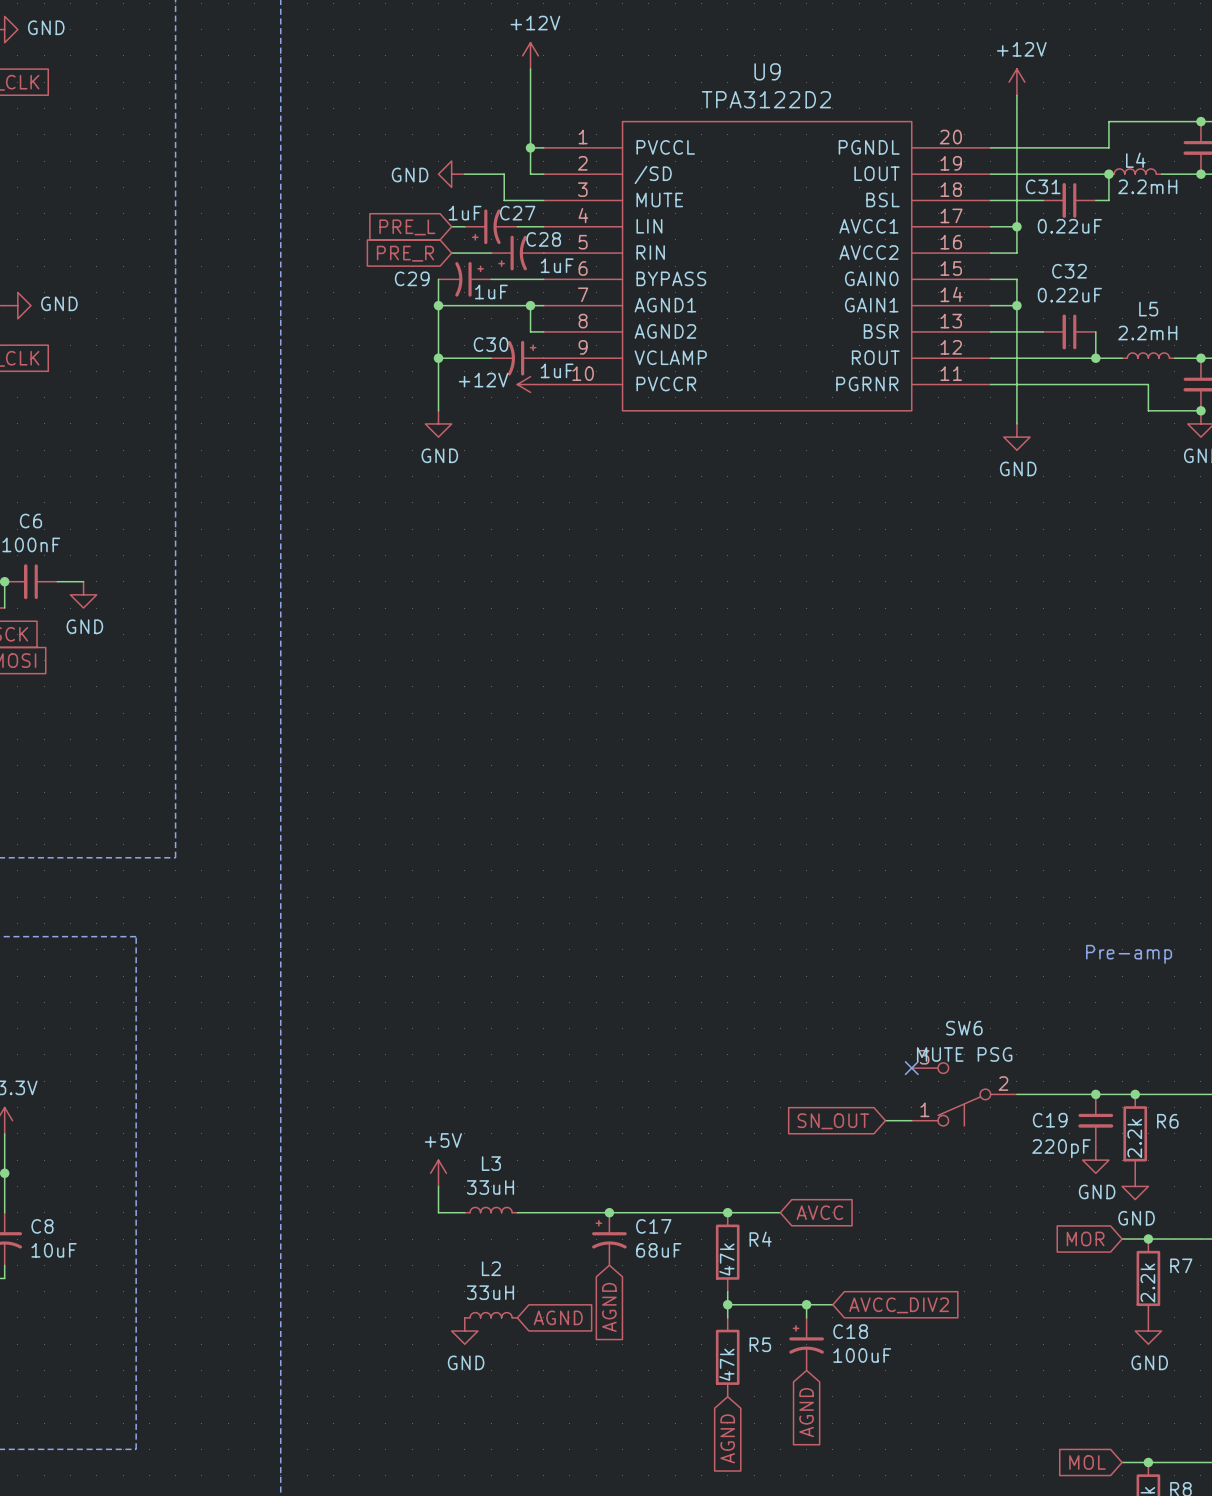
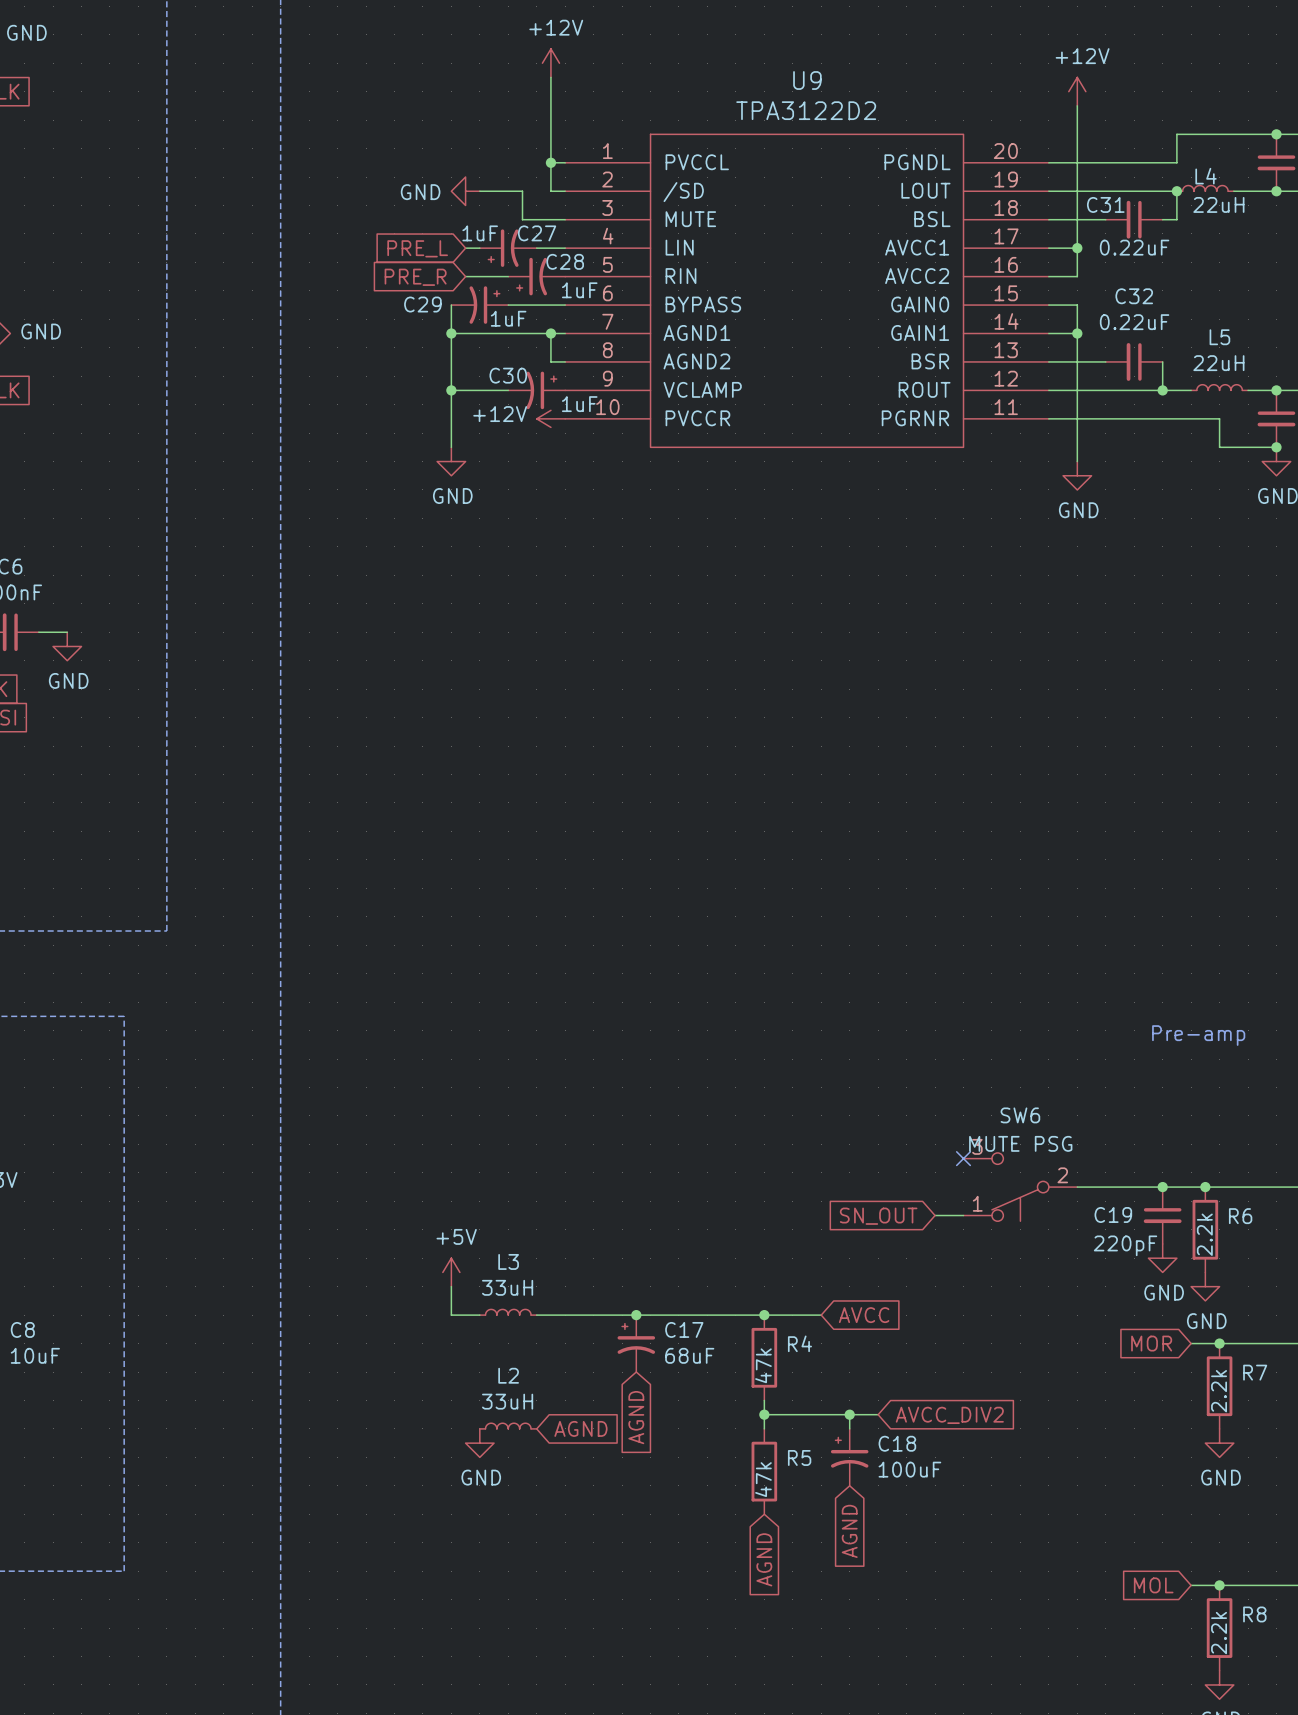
L4 value: 2.2mH (1147, 186) -> 22uH (1218, 204)
L5 value: 2.2mH (1147, 333) -> 22uH (1218, 363)

